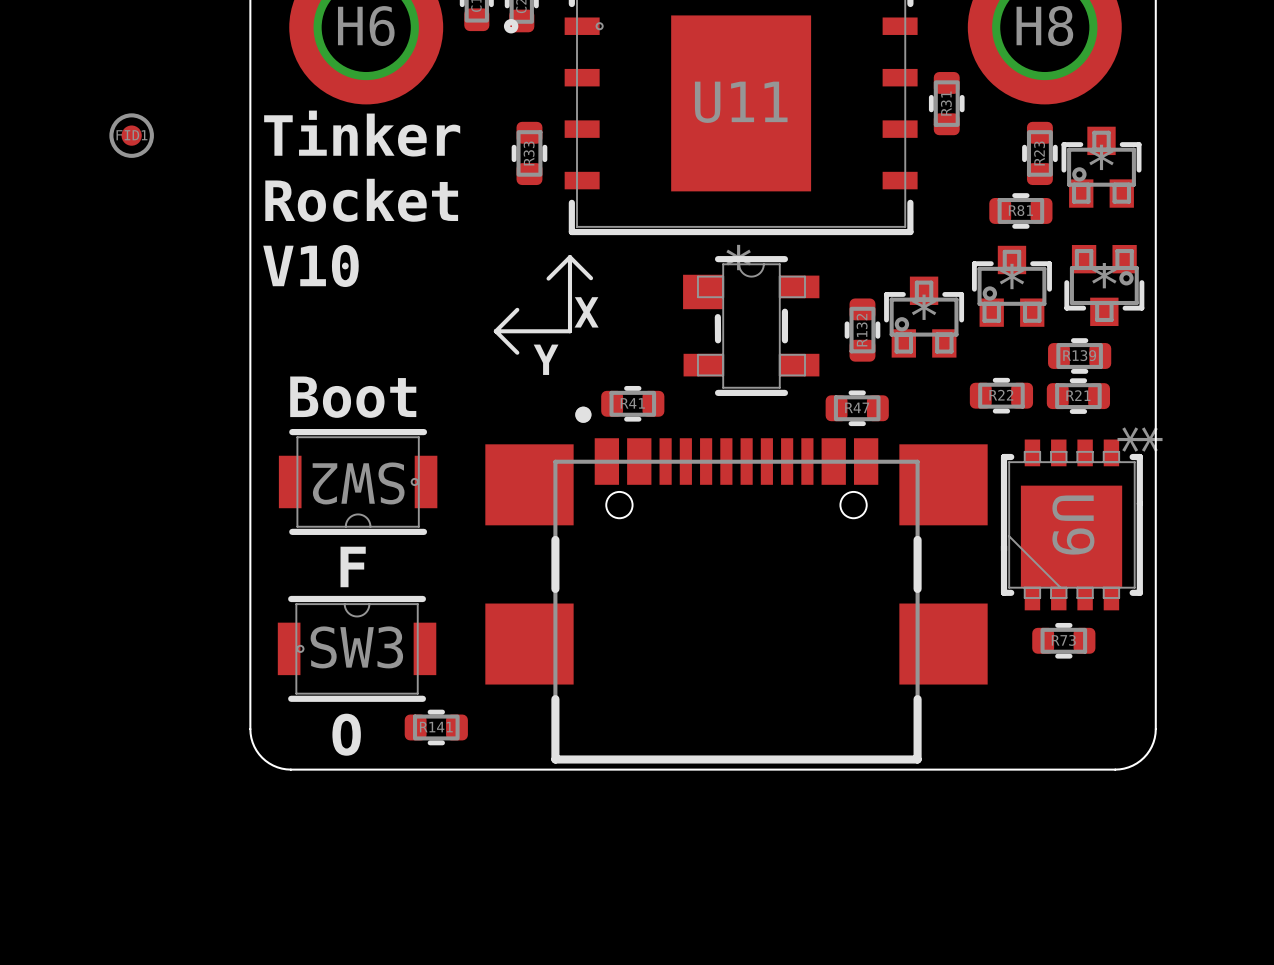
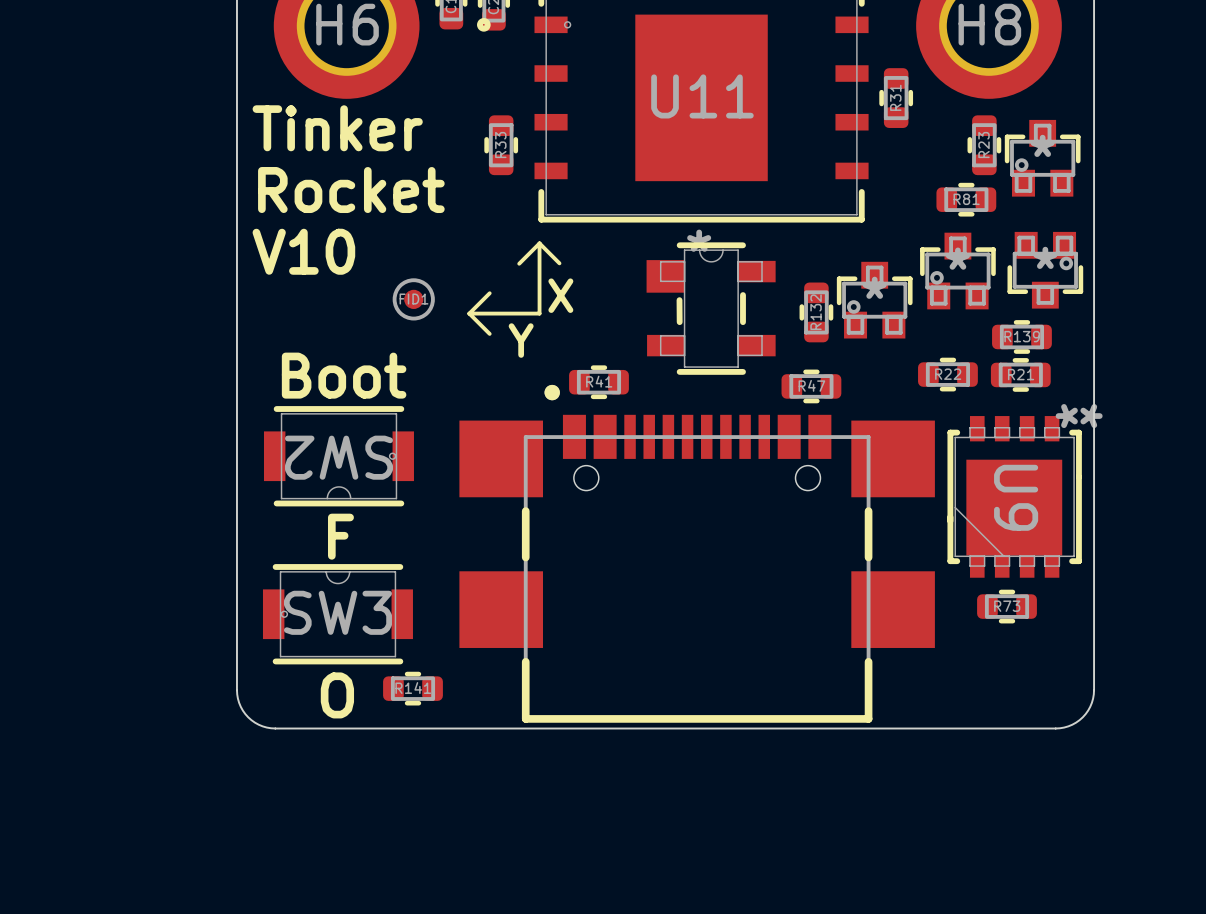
FID1 position: (131, 135) -> (413, 299)

